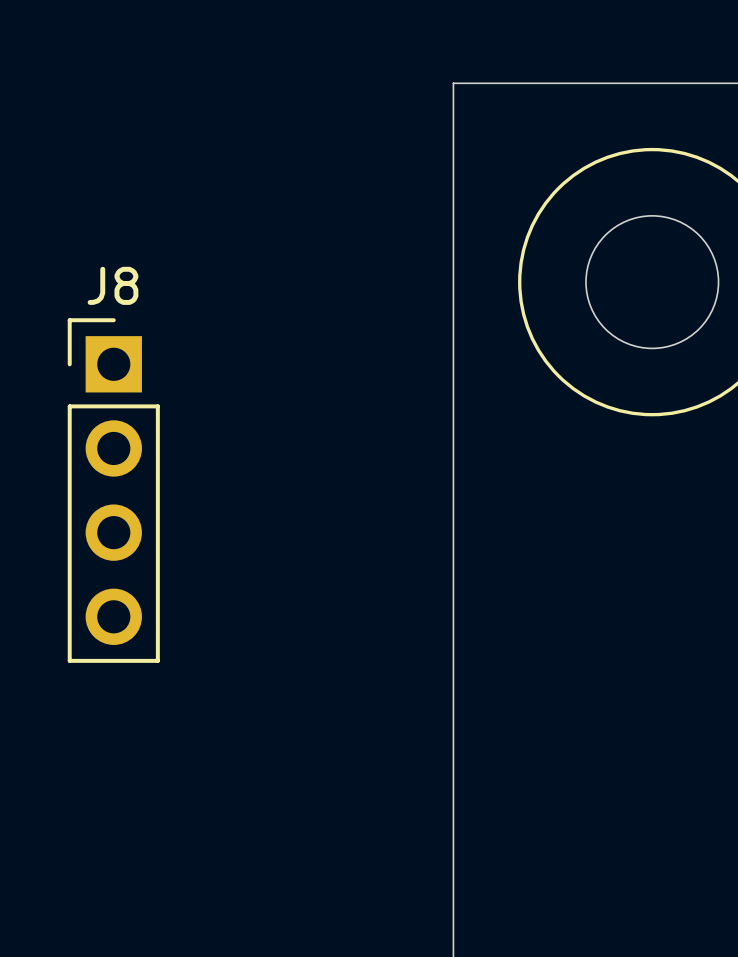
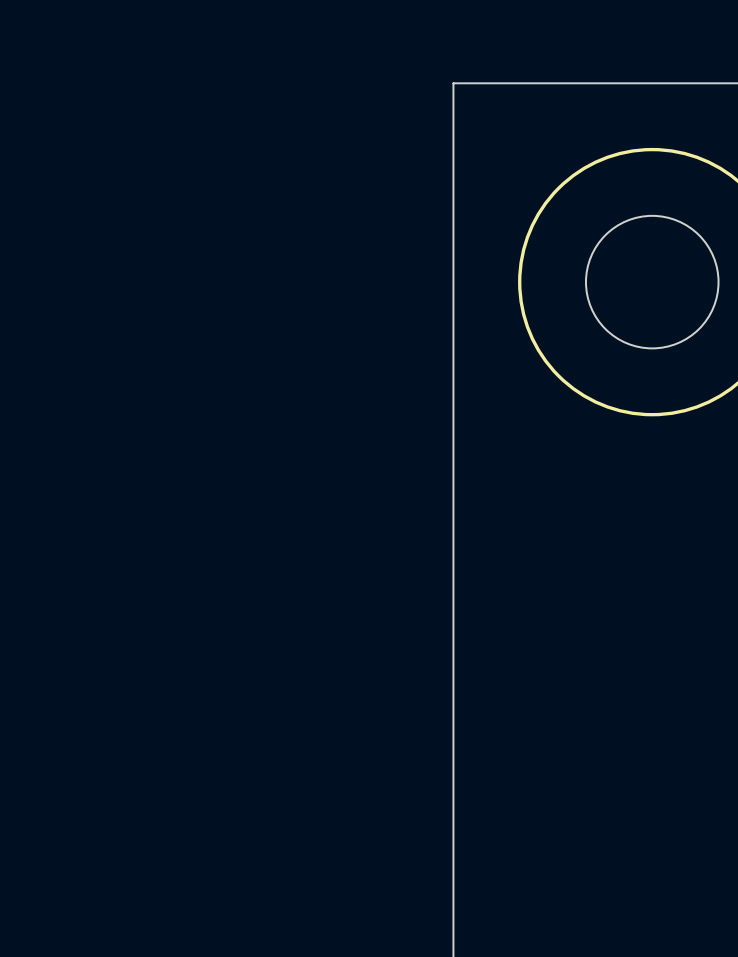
J8: (113, 490) -> none

